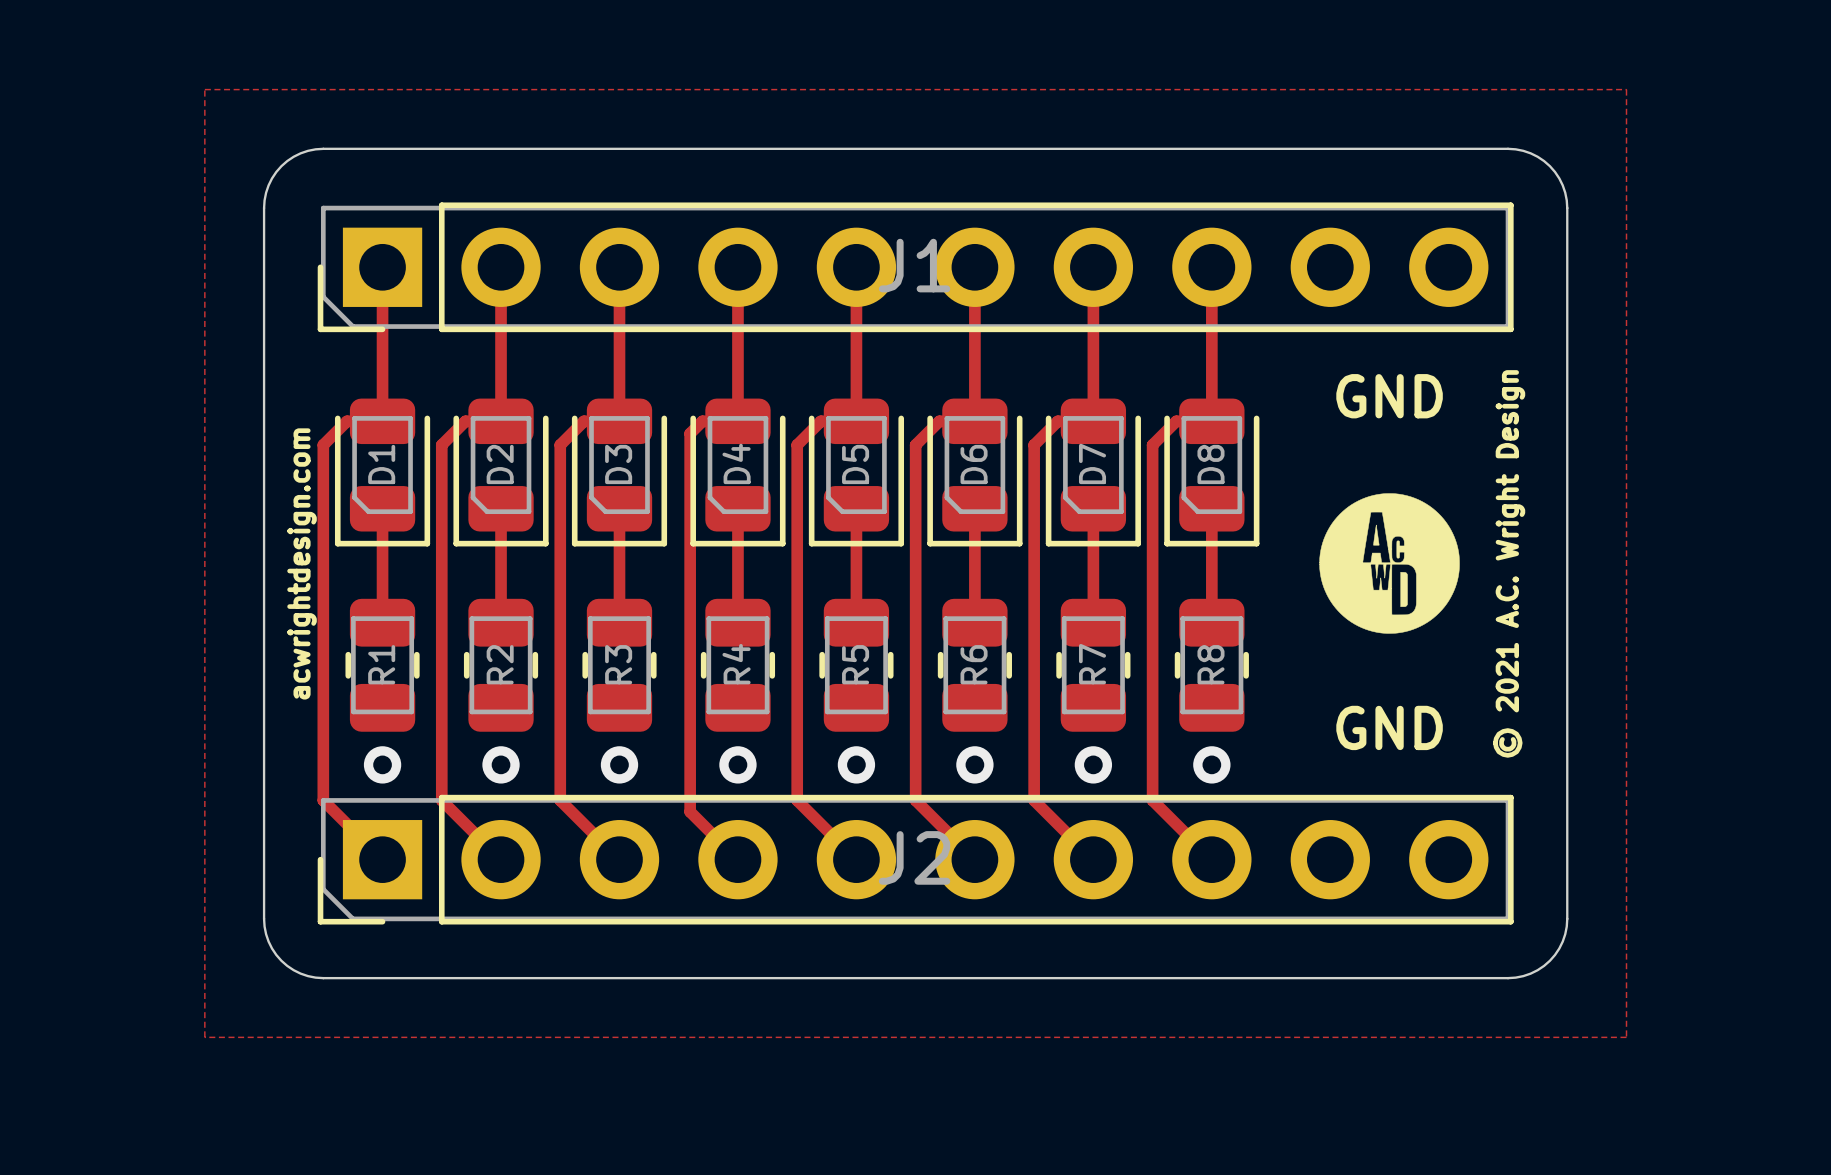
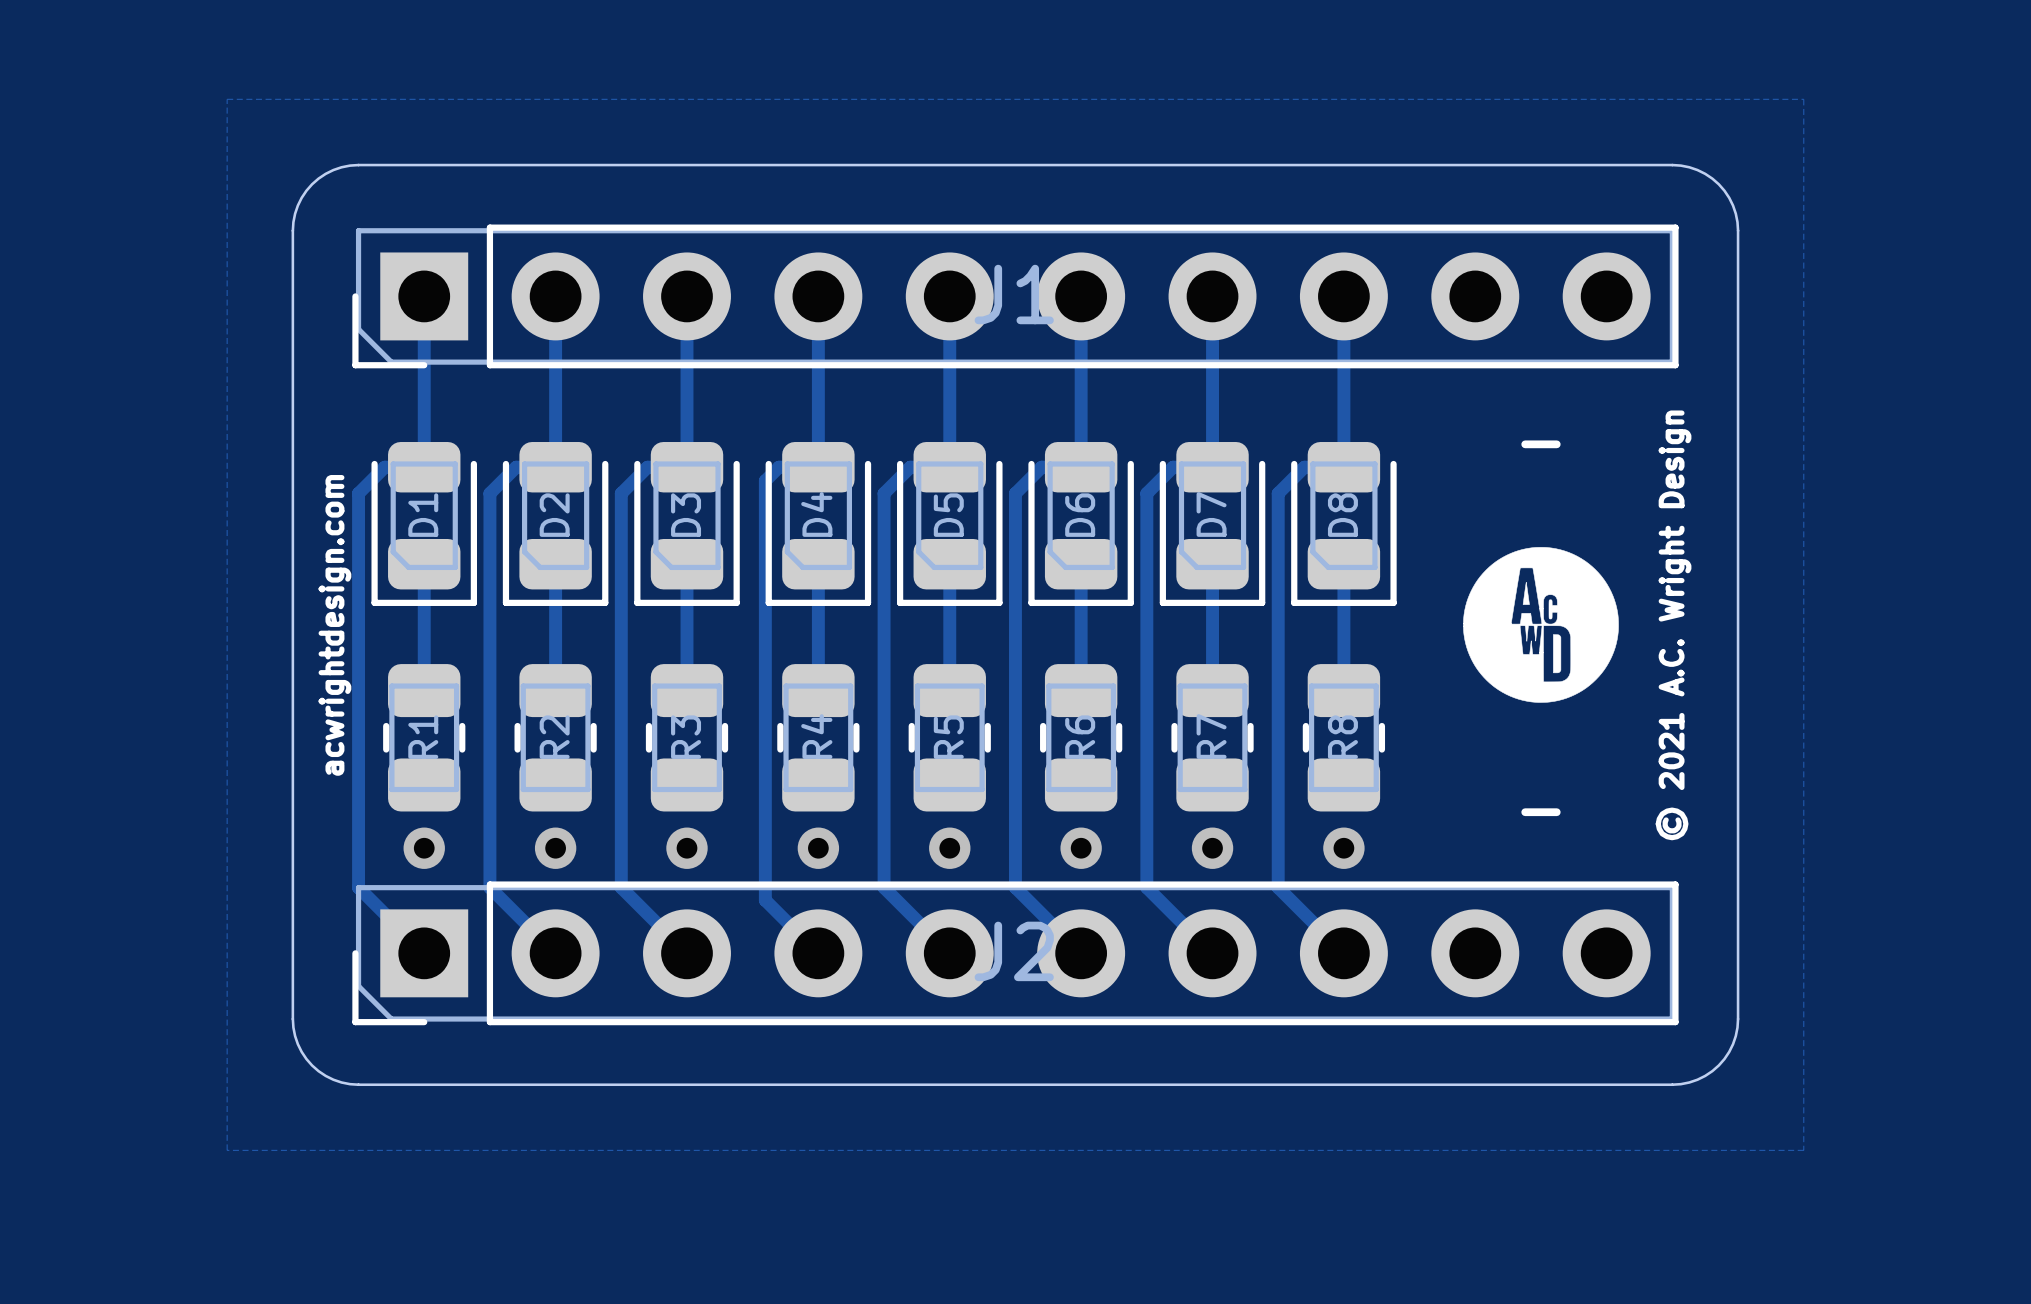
text: GND (1389, 396) -> - (1540, 444)
text: GND (1389, 727) -> - (1540, 812)

